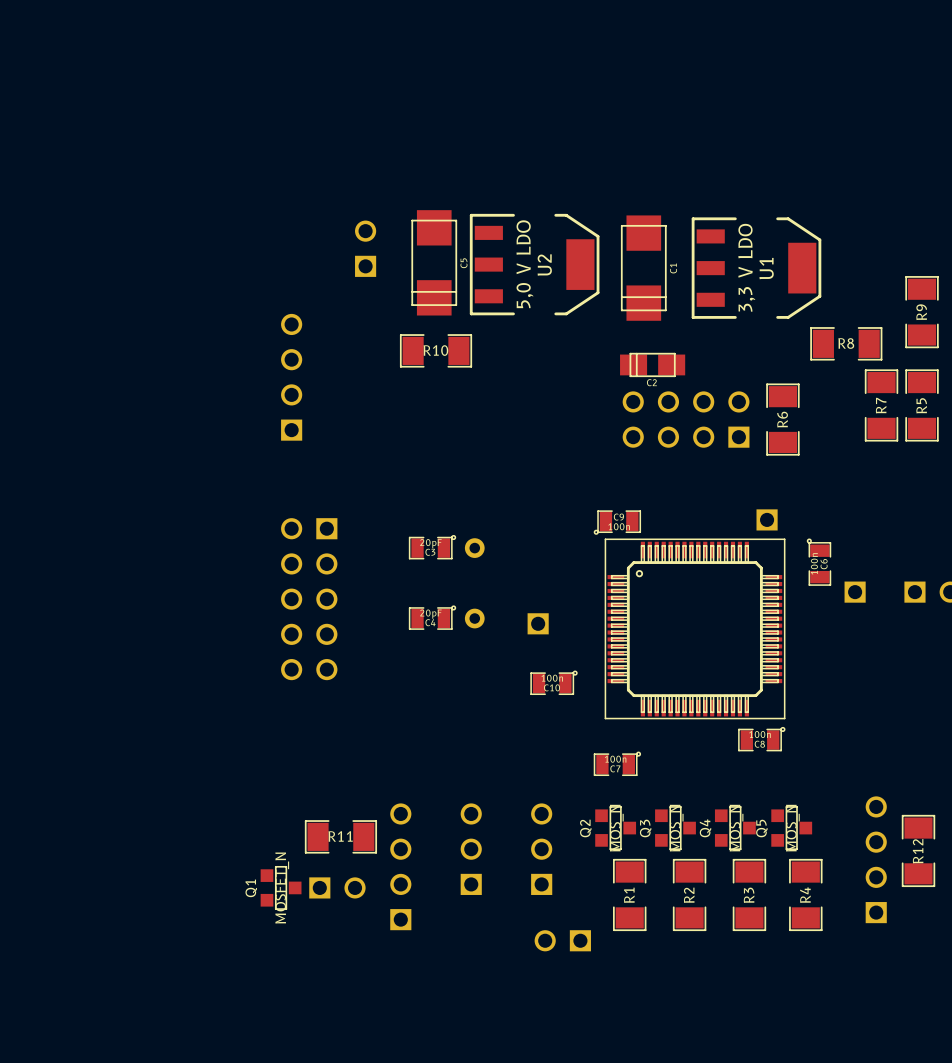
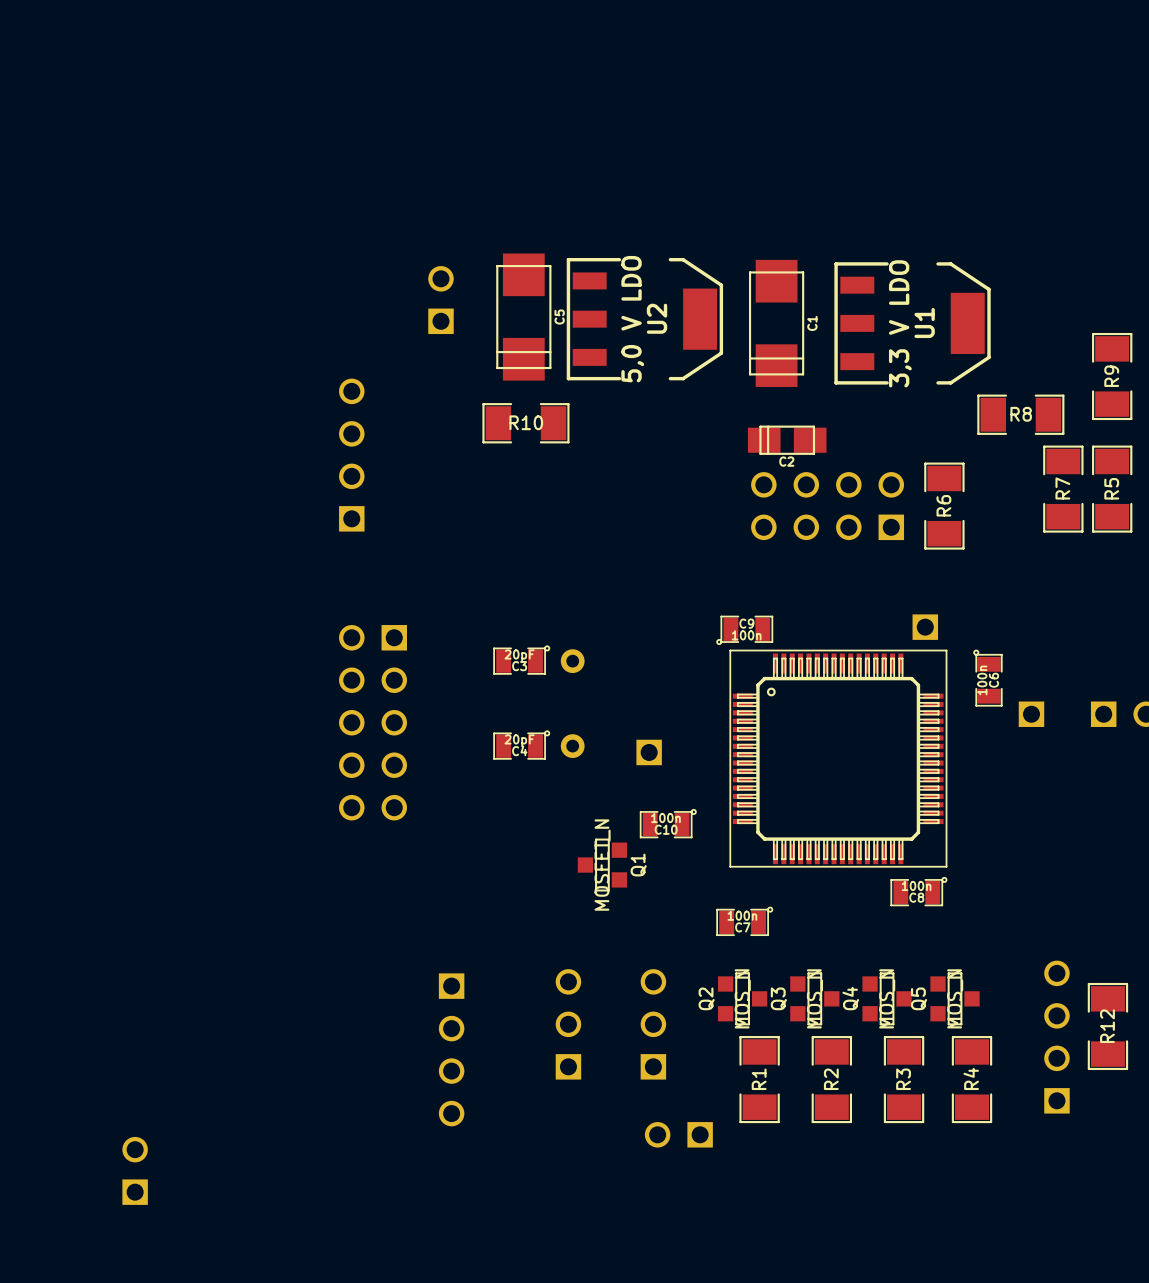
R11: (340, 836) -> none
part rotation: 0° (400, 866) -> 180° (451, 1049)
Q1 rotation: 0° (281, 887) -> 180° (602, 865)
Q1 position: (281, 887) -> (602, 865)
part rotation: 0° (337, 887) -> 90° counterclockwise (135, 1170)
part position: (337, 887) -> (135, 1170)

